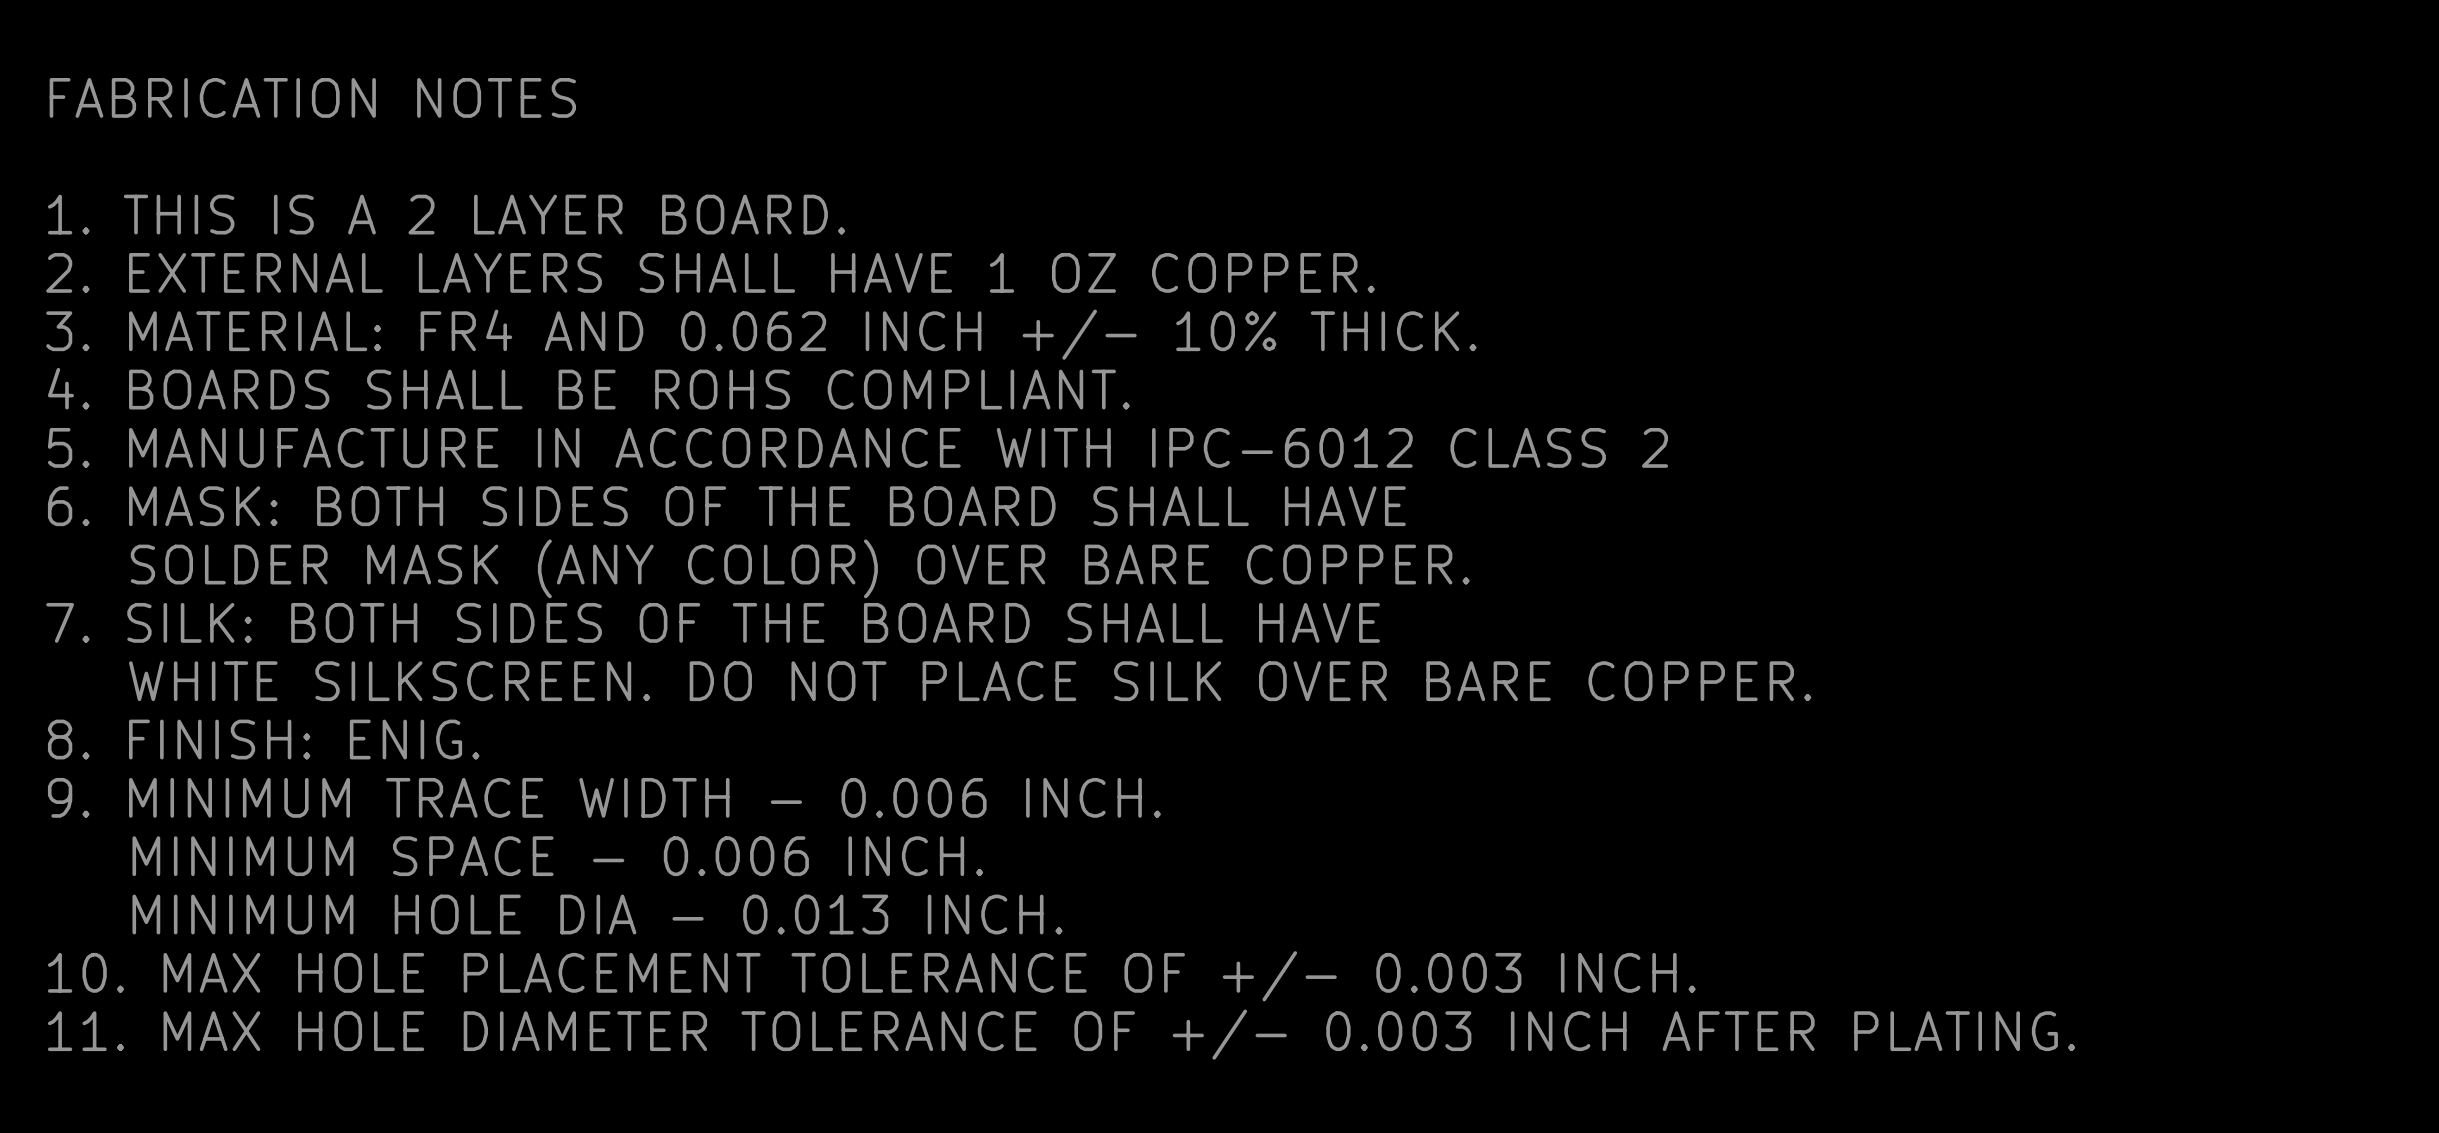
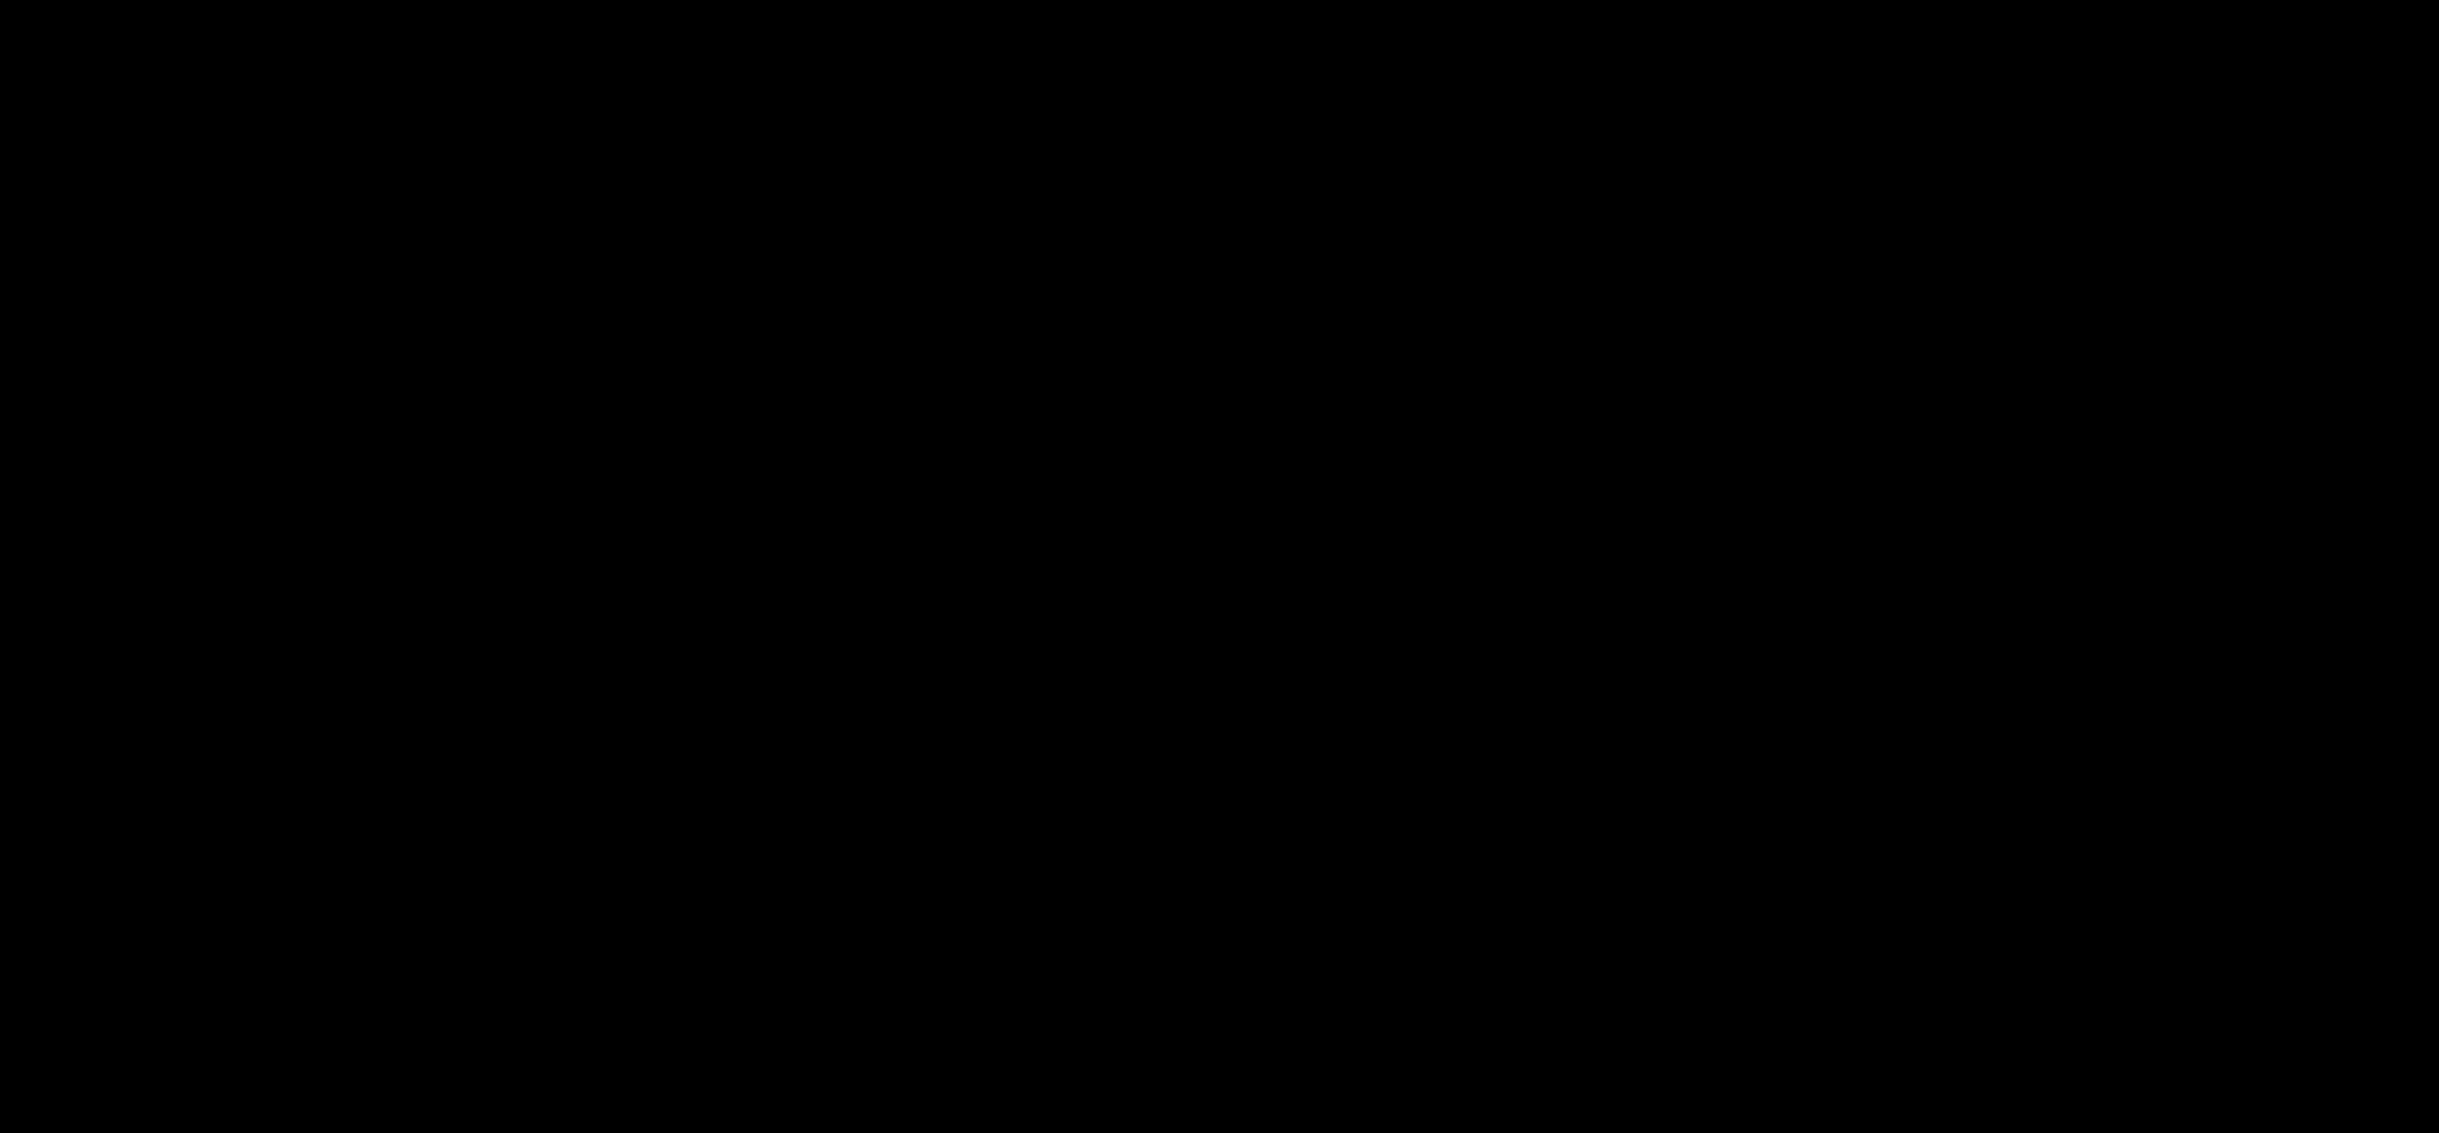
text: FABRICATION NOTES (312, 97) -> none
text: 1. THIS IS A 2 LAYER BOARD. (446, 214) -> none
text: 2. EXTERNAL LAYERS SHALL HAVE 1 OZ COPPER. (710, 272) -> none
text: 3. MATERIAL: FR4 AND 0.062 INCH +/- 10% THICK. (761, 334) -> none
text: 4. BOARDS SHALL BE ROHS COMPLIANT. (588, 388) -> none
text: 5. MANUFACTURE IN ACCORDANCE WITH IPC-6012 CLASS 2 (857, 447) -> none
text: 6. MASK: BOTH SIDES OF THE BOARD SHALL HAVE (726, 506) -> none
text: SOLDER MASK (ANY COLOR) OVER BARE COPPER. (800, 568) -> none
text: 7. SILK: BOTH SIDES OF THE BOARD SHALL HAVE (713, 622) -> none
text: WHITE SILKSCREEN. DO NOT PLACE SILK OVER BARE COPPER. (970, 681) -> none
text: 8. FINISH: ENIG. (263, 739) -> none
text: 9. MINIMUM TRACE WIDTH - 0.006 INCH. (604, 797) -> none
text: MINIMUM SPACE - 0.006 INCH. (557, 856) -> none
text: MINIMUM HOLE DIA - 0.013 INCH. (597, 914) -> none
text: 10. MAX HOLE PLACEMENT TOLERANCE OF +/- 0.003 INCH. (871, 976) -> none
text: 11. MAX HOLE DIAMETER TOLERANCE OF +/- 0.003 INCH AFTER PLATING. (1061, 1034) -> none

